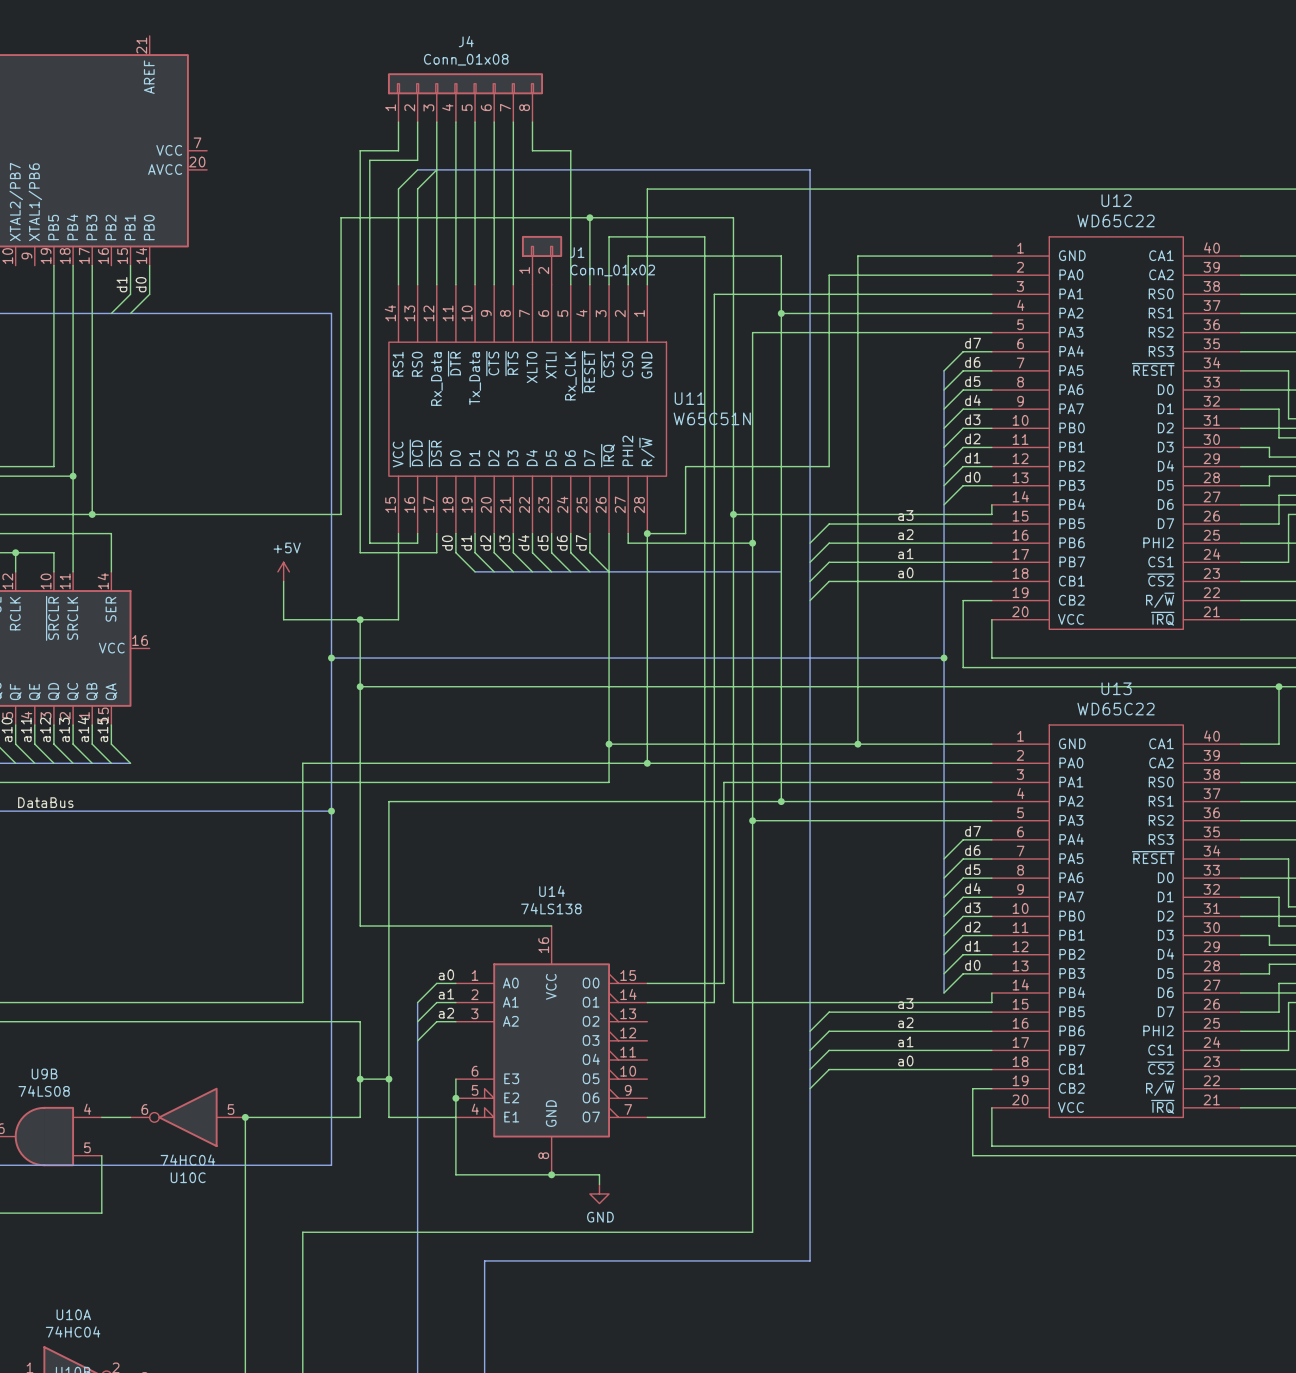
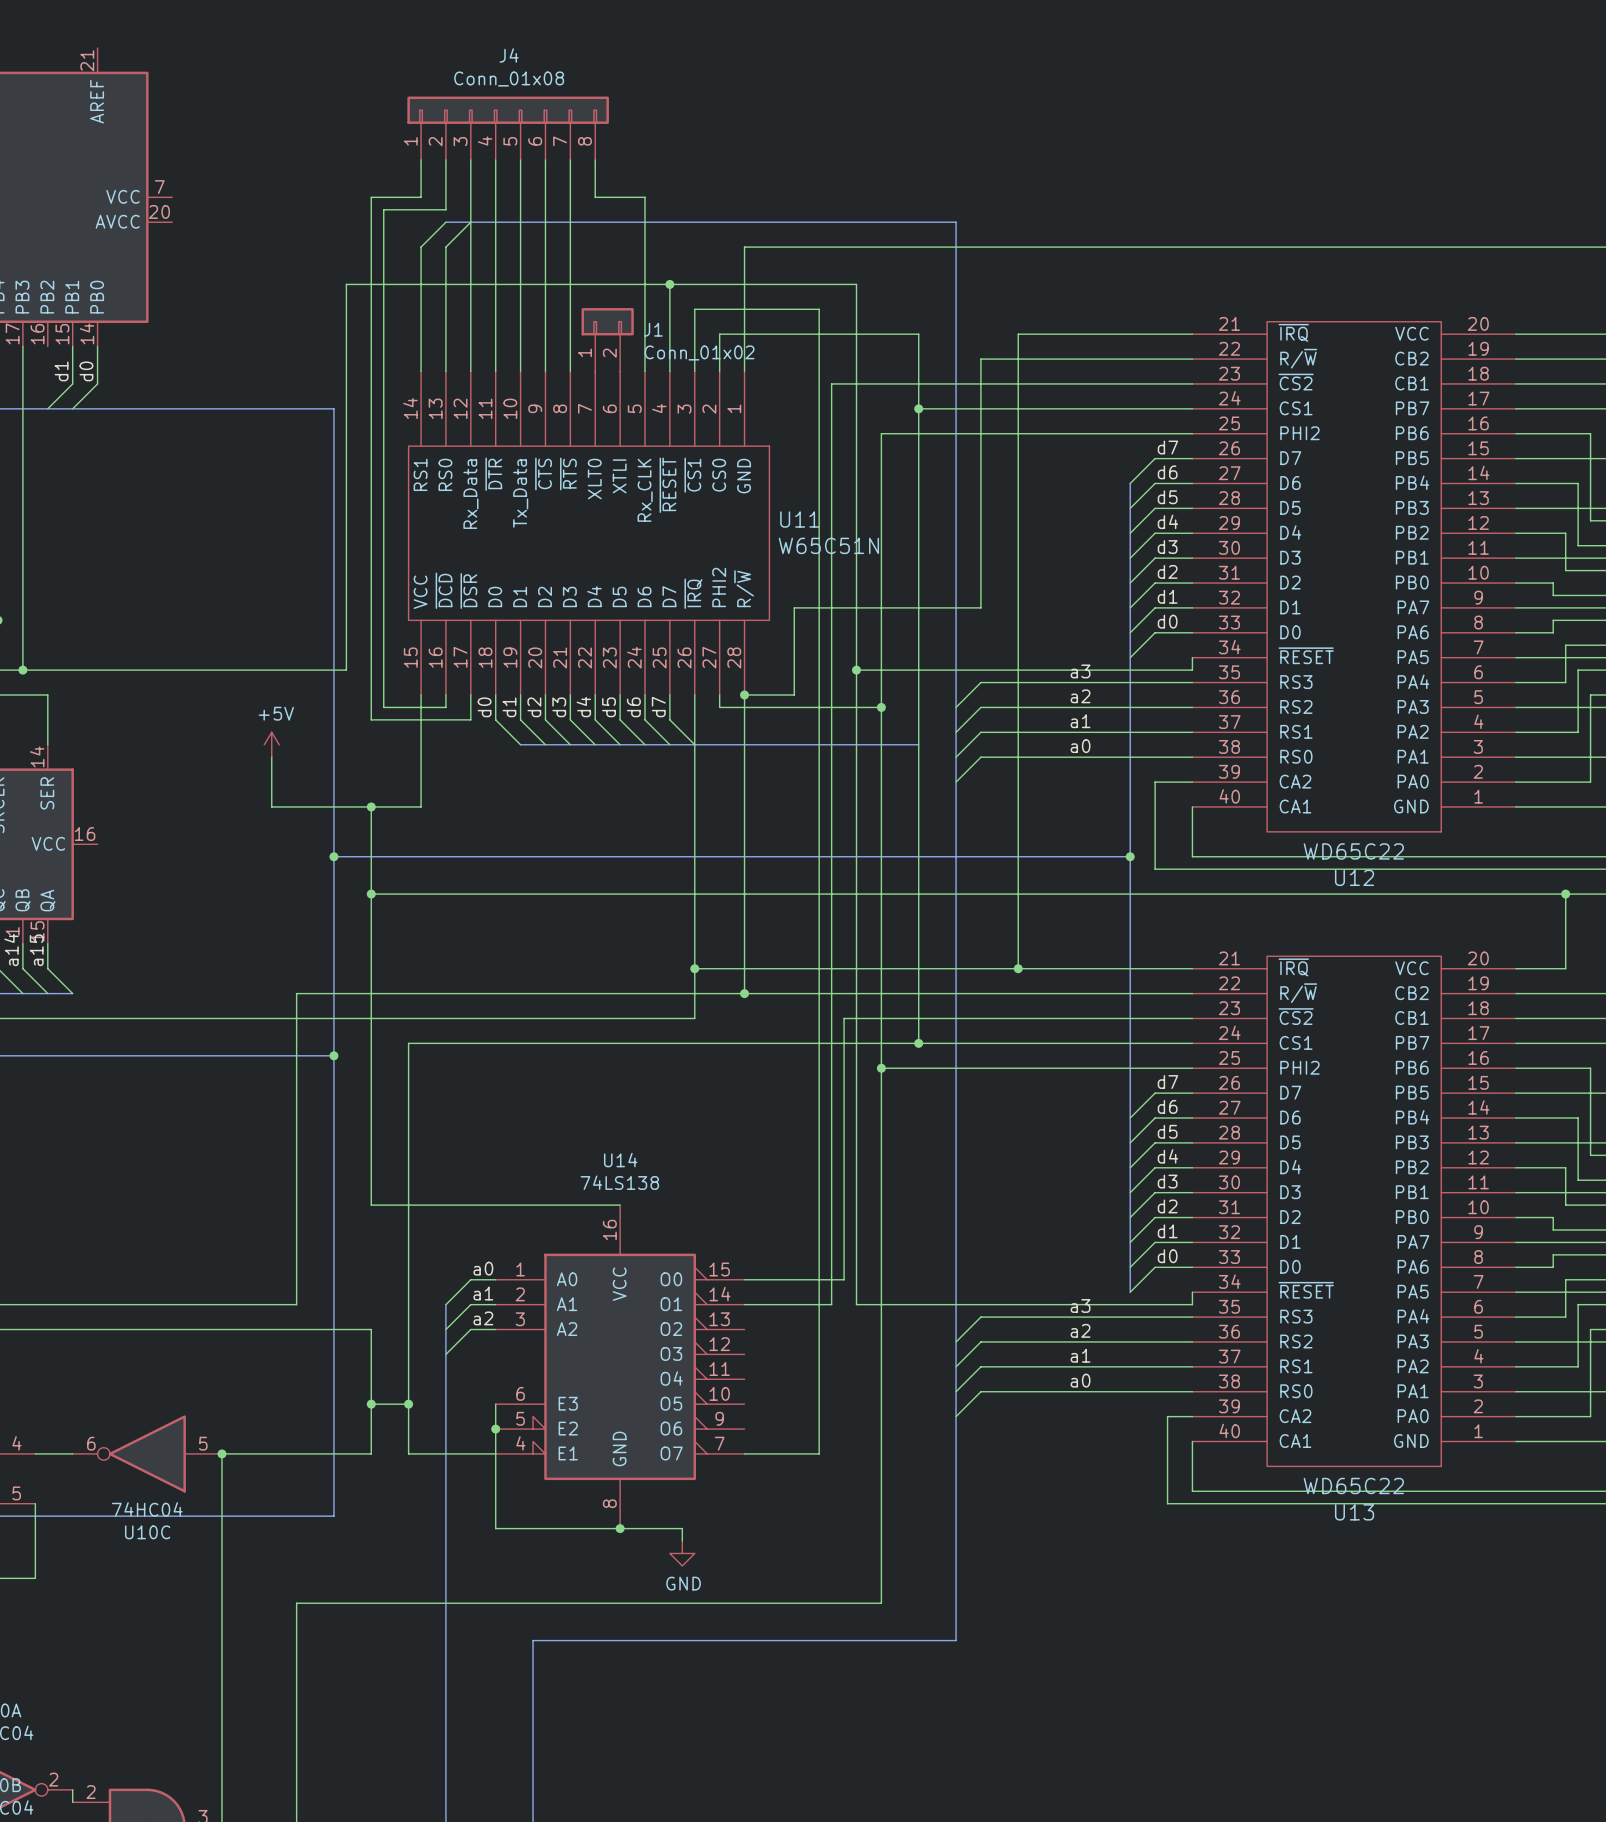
U12 rotation: 0° (1116, 433) -> 180° (1354, 576)
U13 rotation: 0° (1116, 921) -> 180° (1354, 1211)

